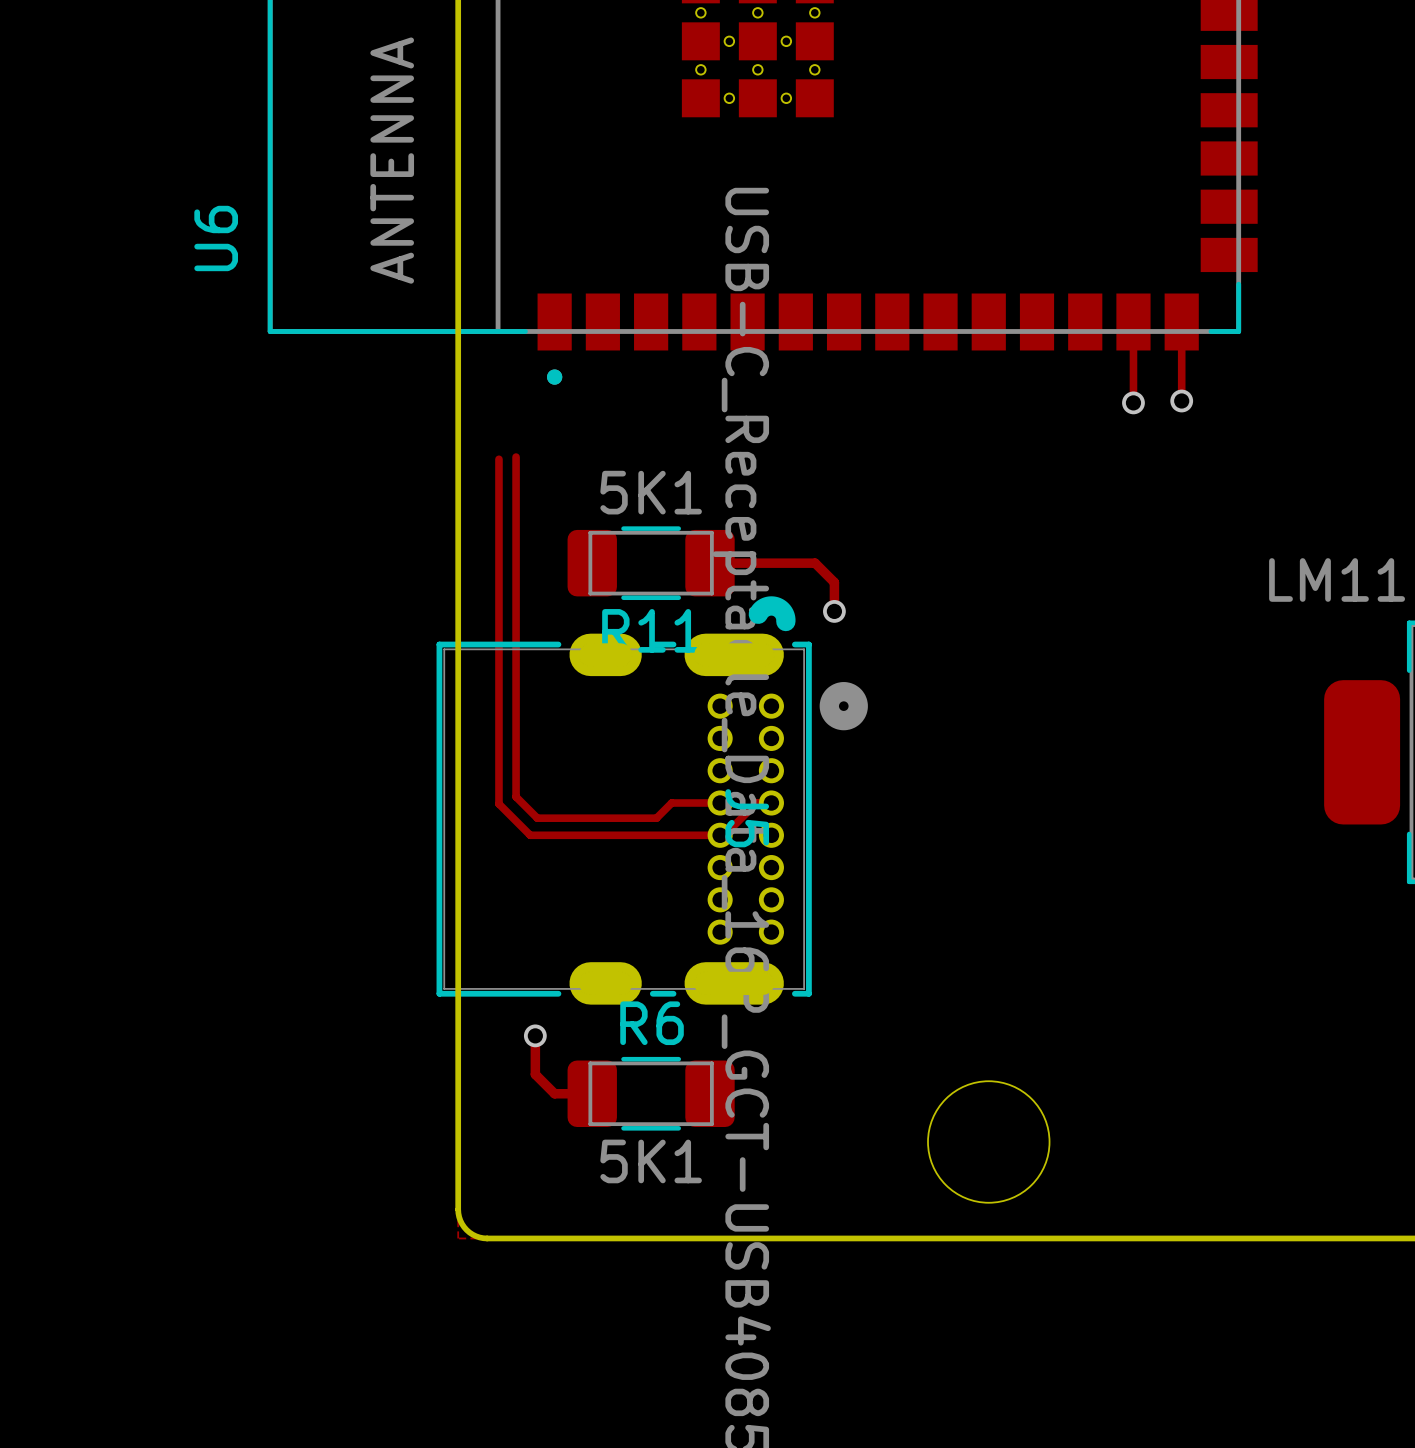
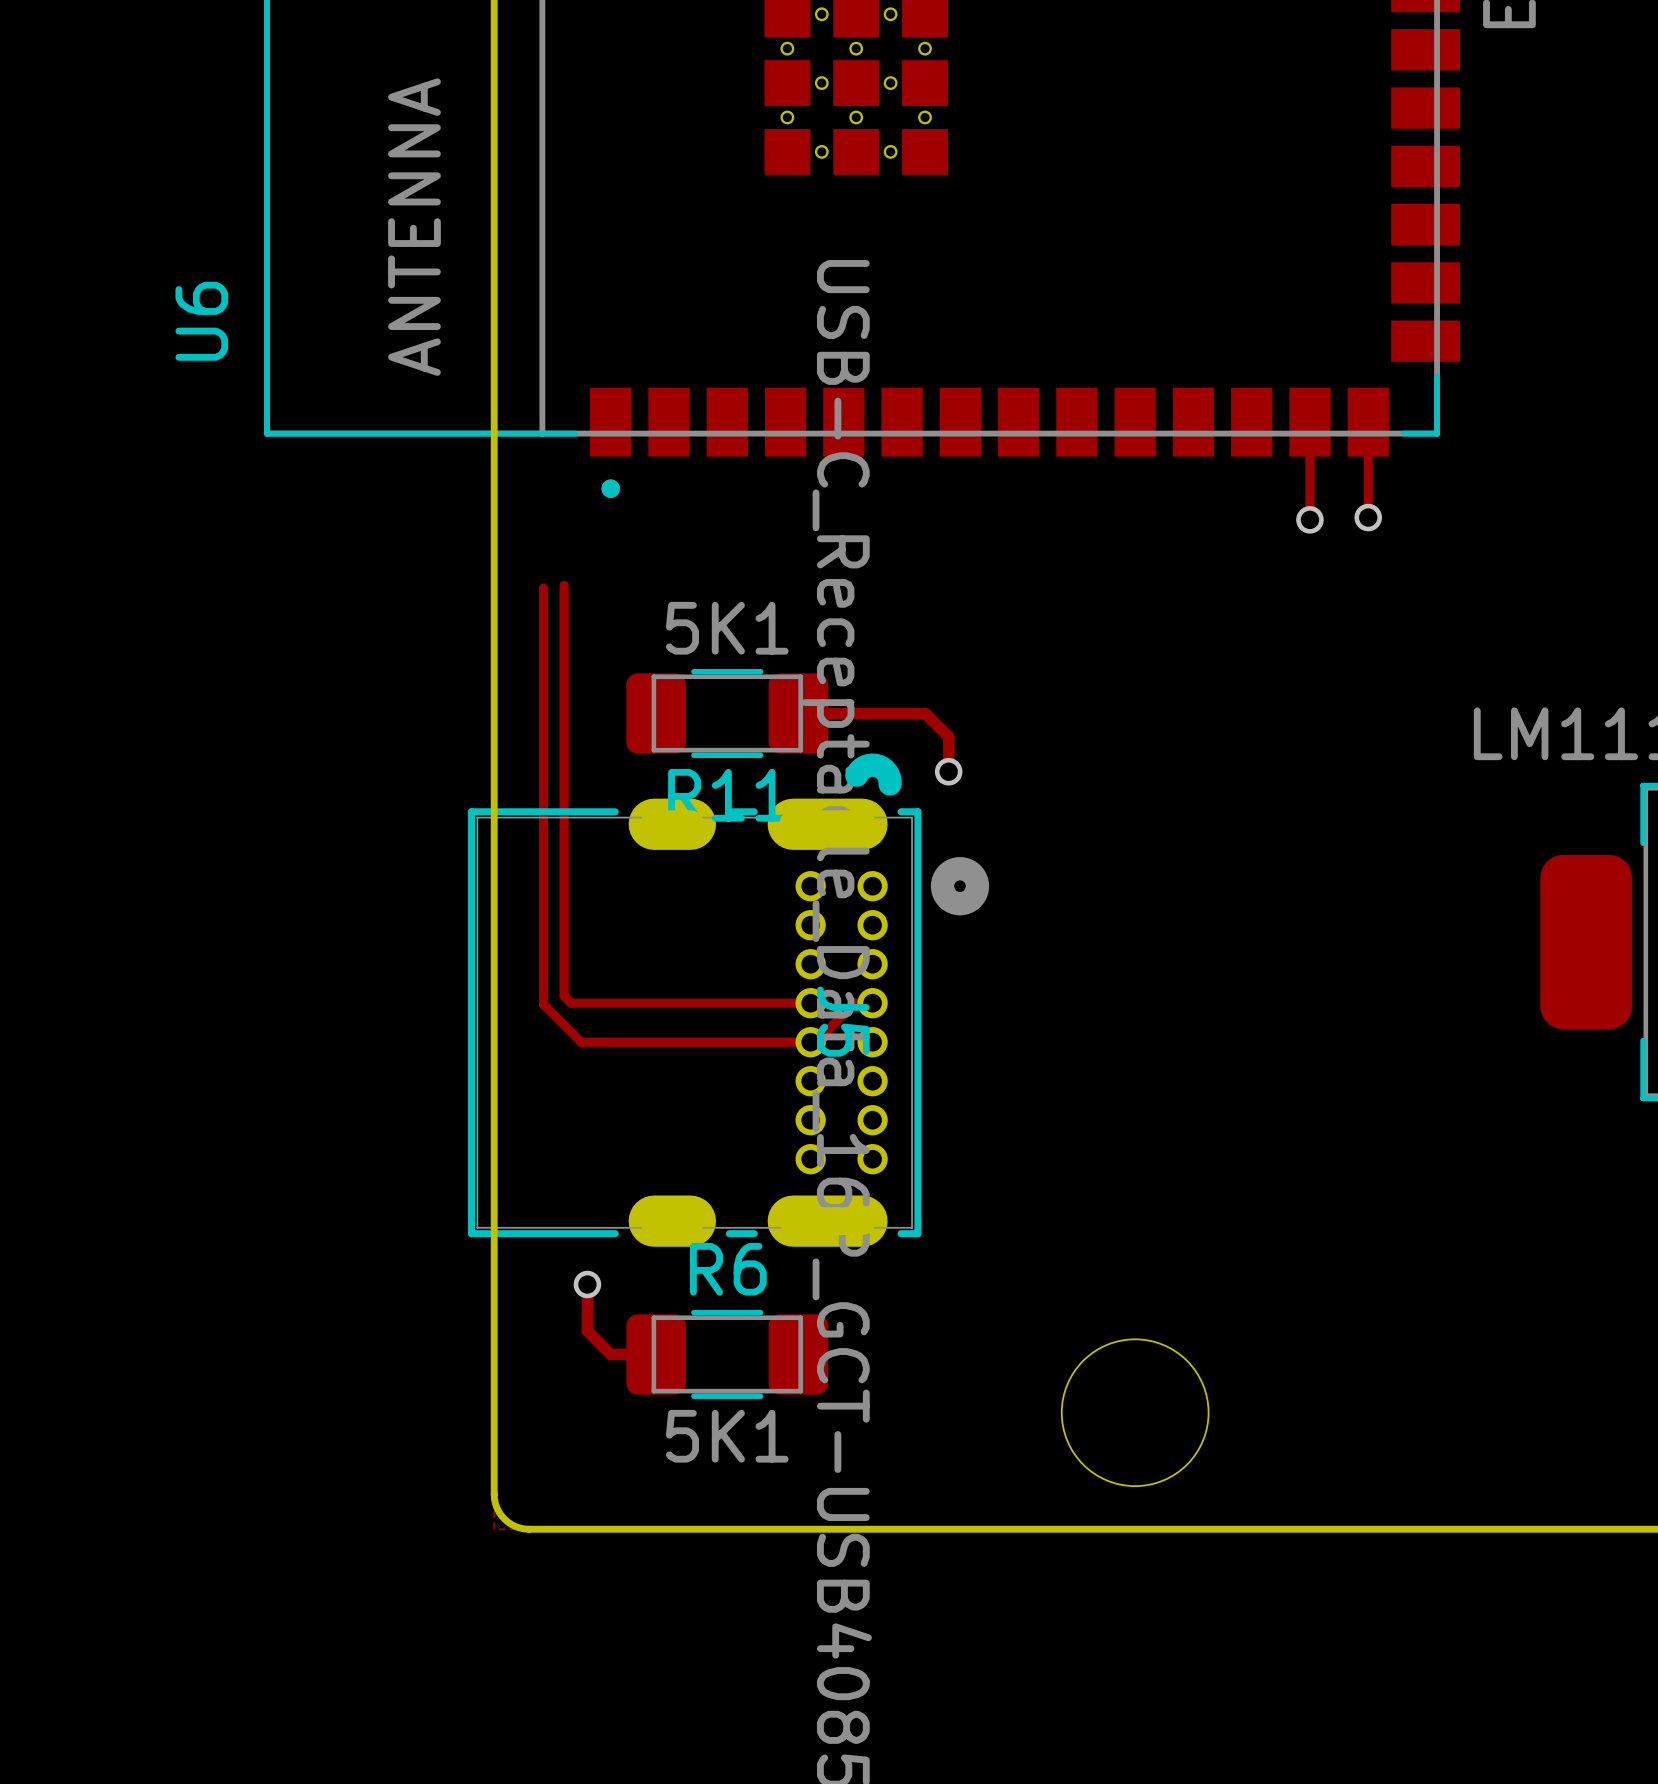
track: (522, 803) (537, 818) (656, 818) (671, 803) -> (571, 1003) (752, 1003)

